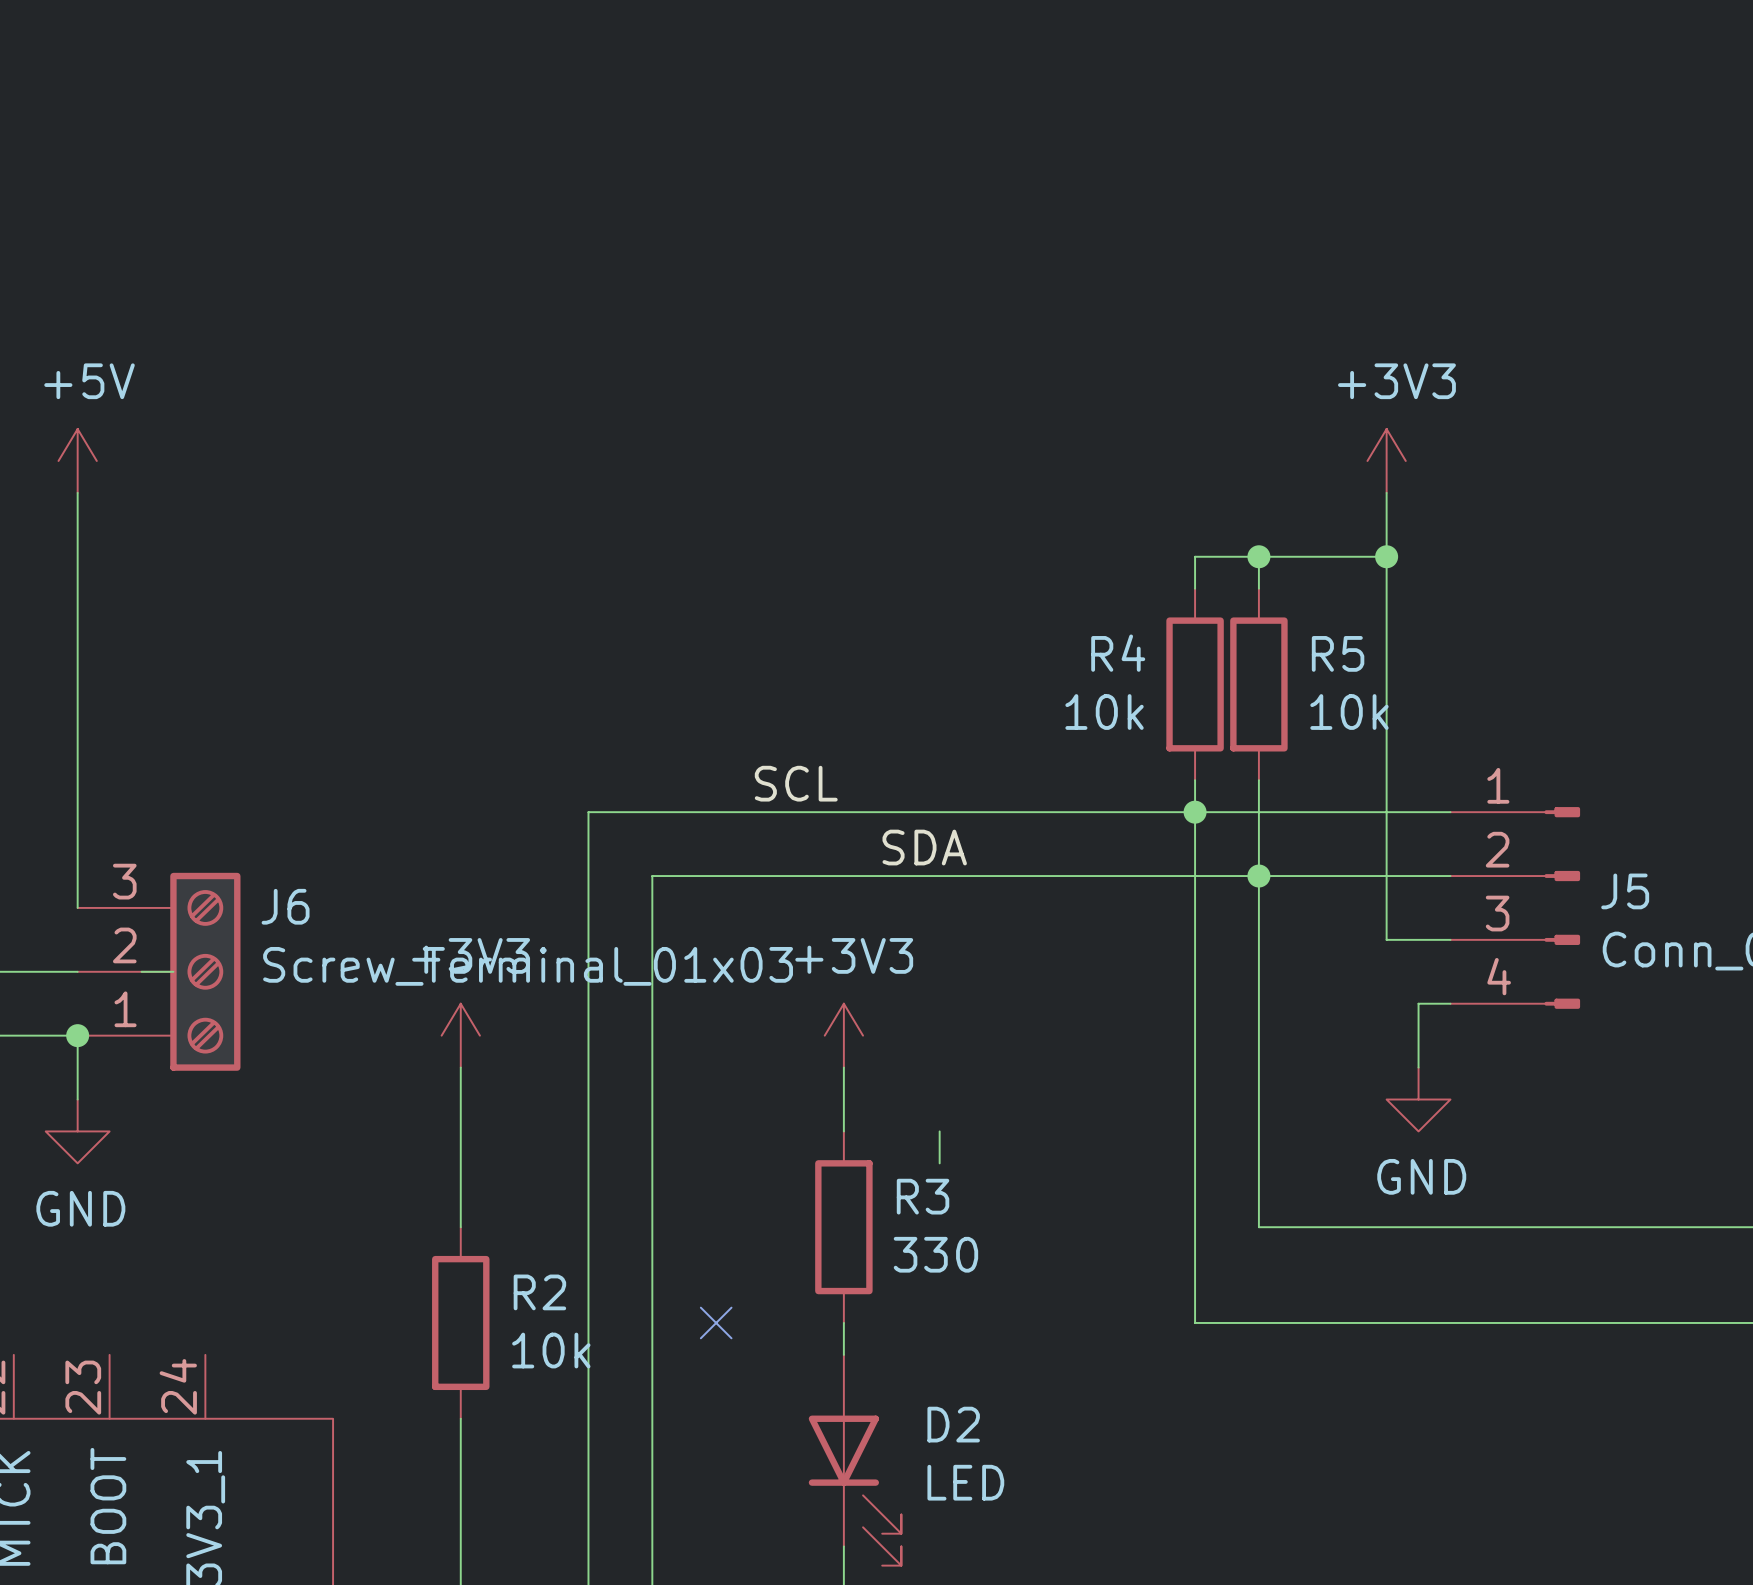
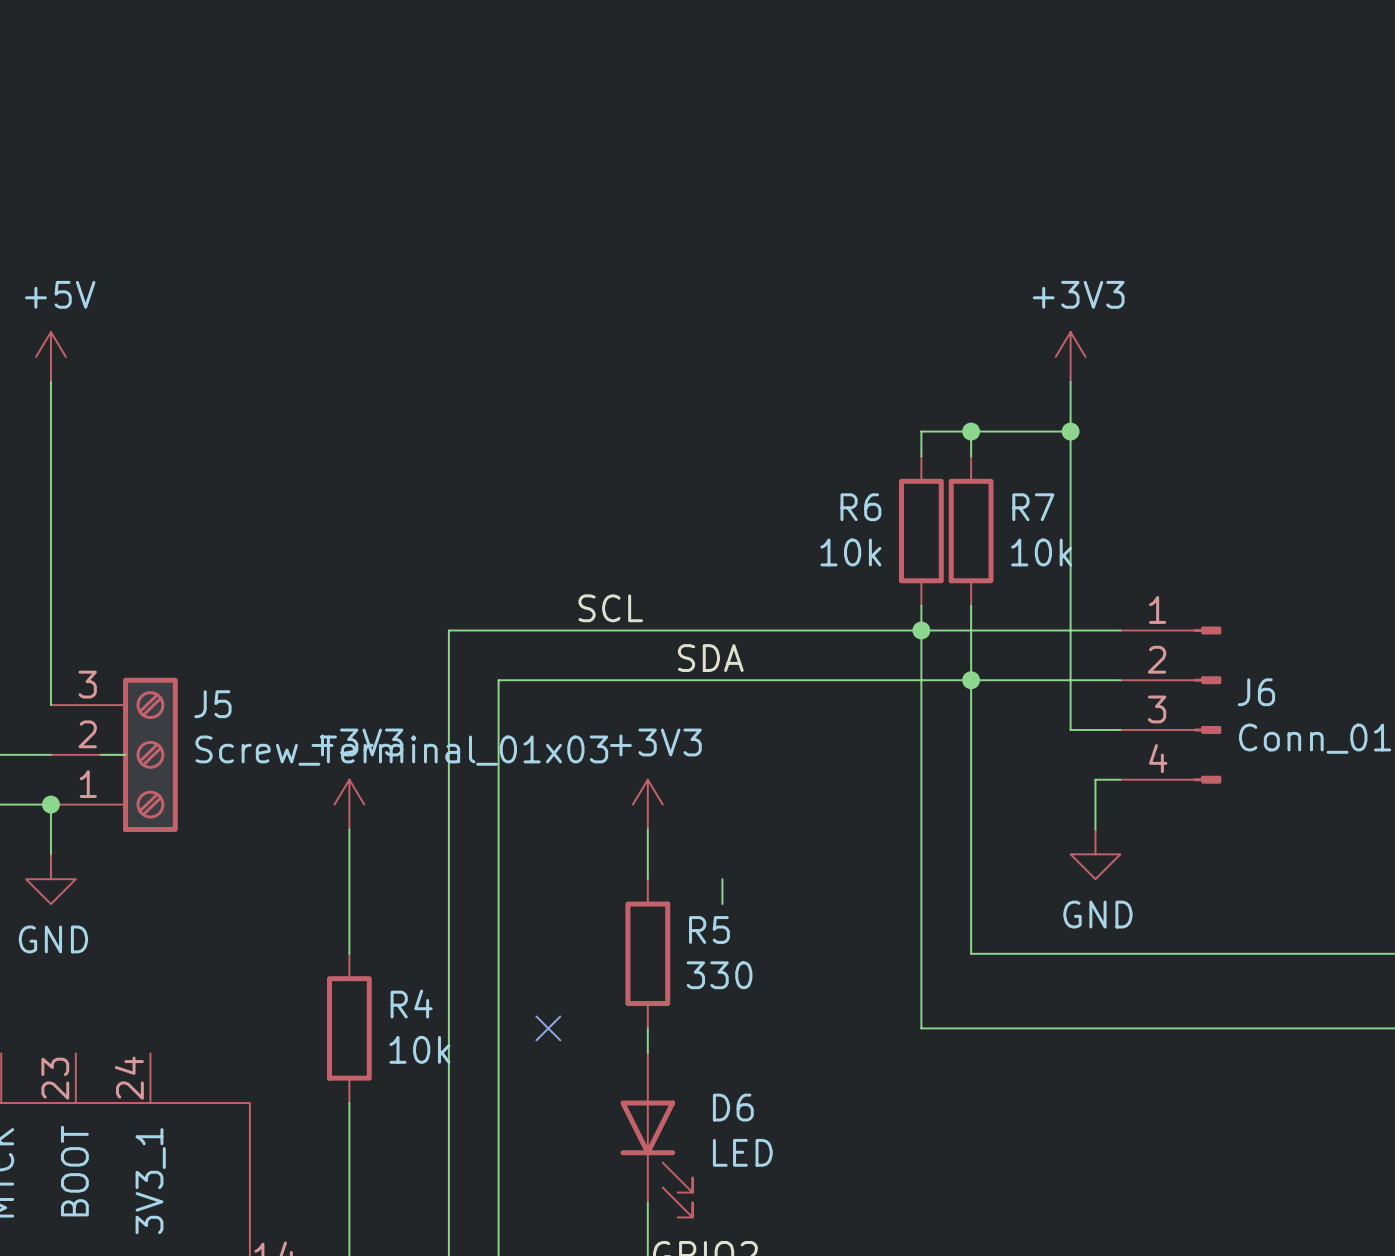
R4 name: R4 (1118, 653) -> R6 (860, 507)
R5 name: R5 (1338, 653) -> R7 (1033, 507)
J5 name: J5 (1625, 891) -> J6 (1256, 692)
J6 name: J6 (285, 906) -> J5 (212, 704)
R3 name: R3 (923, 1196) -> R5 (709, 929)
R2 name: R2 (539, 1292) -> R4 (411, 1004)
D2 name: D2 (953, 1424) -> D6 (733, 1107)

